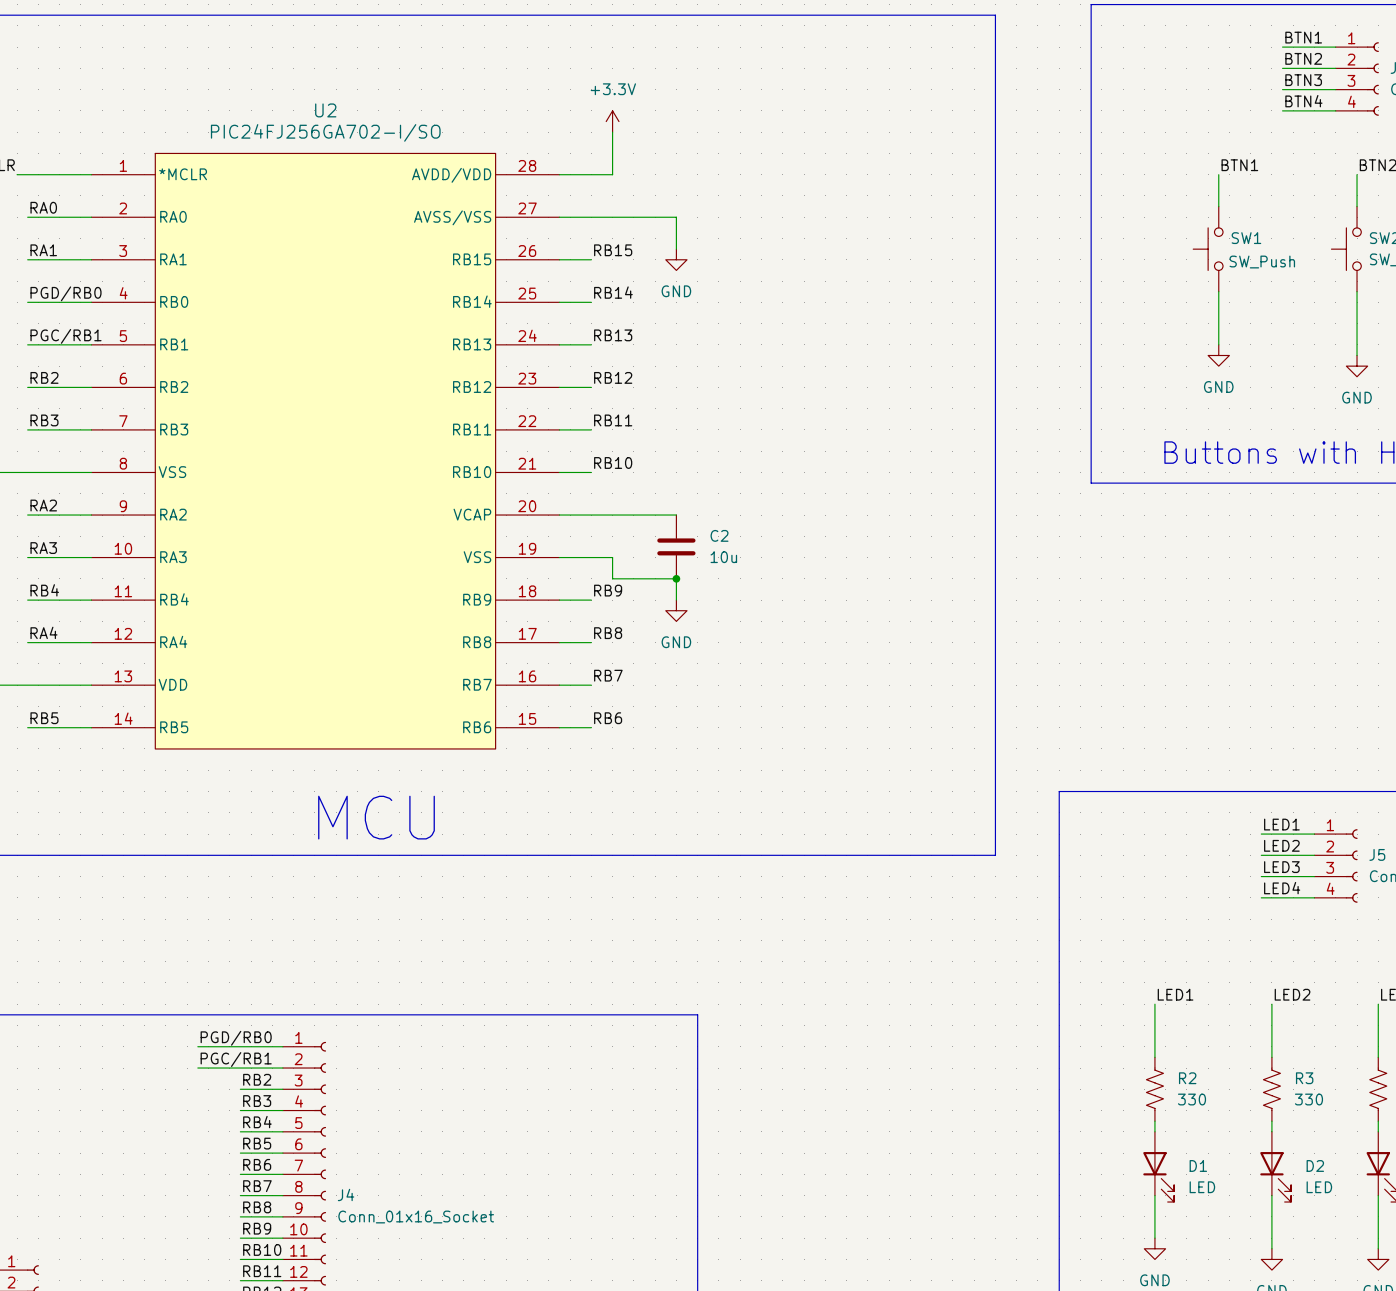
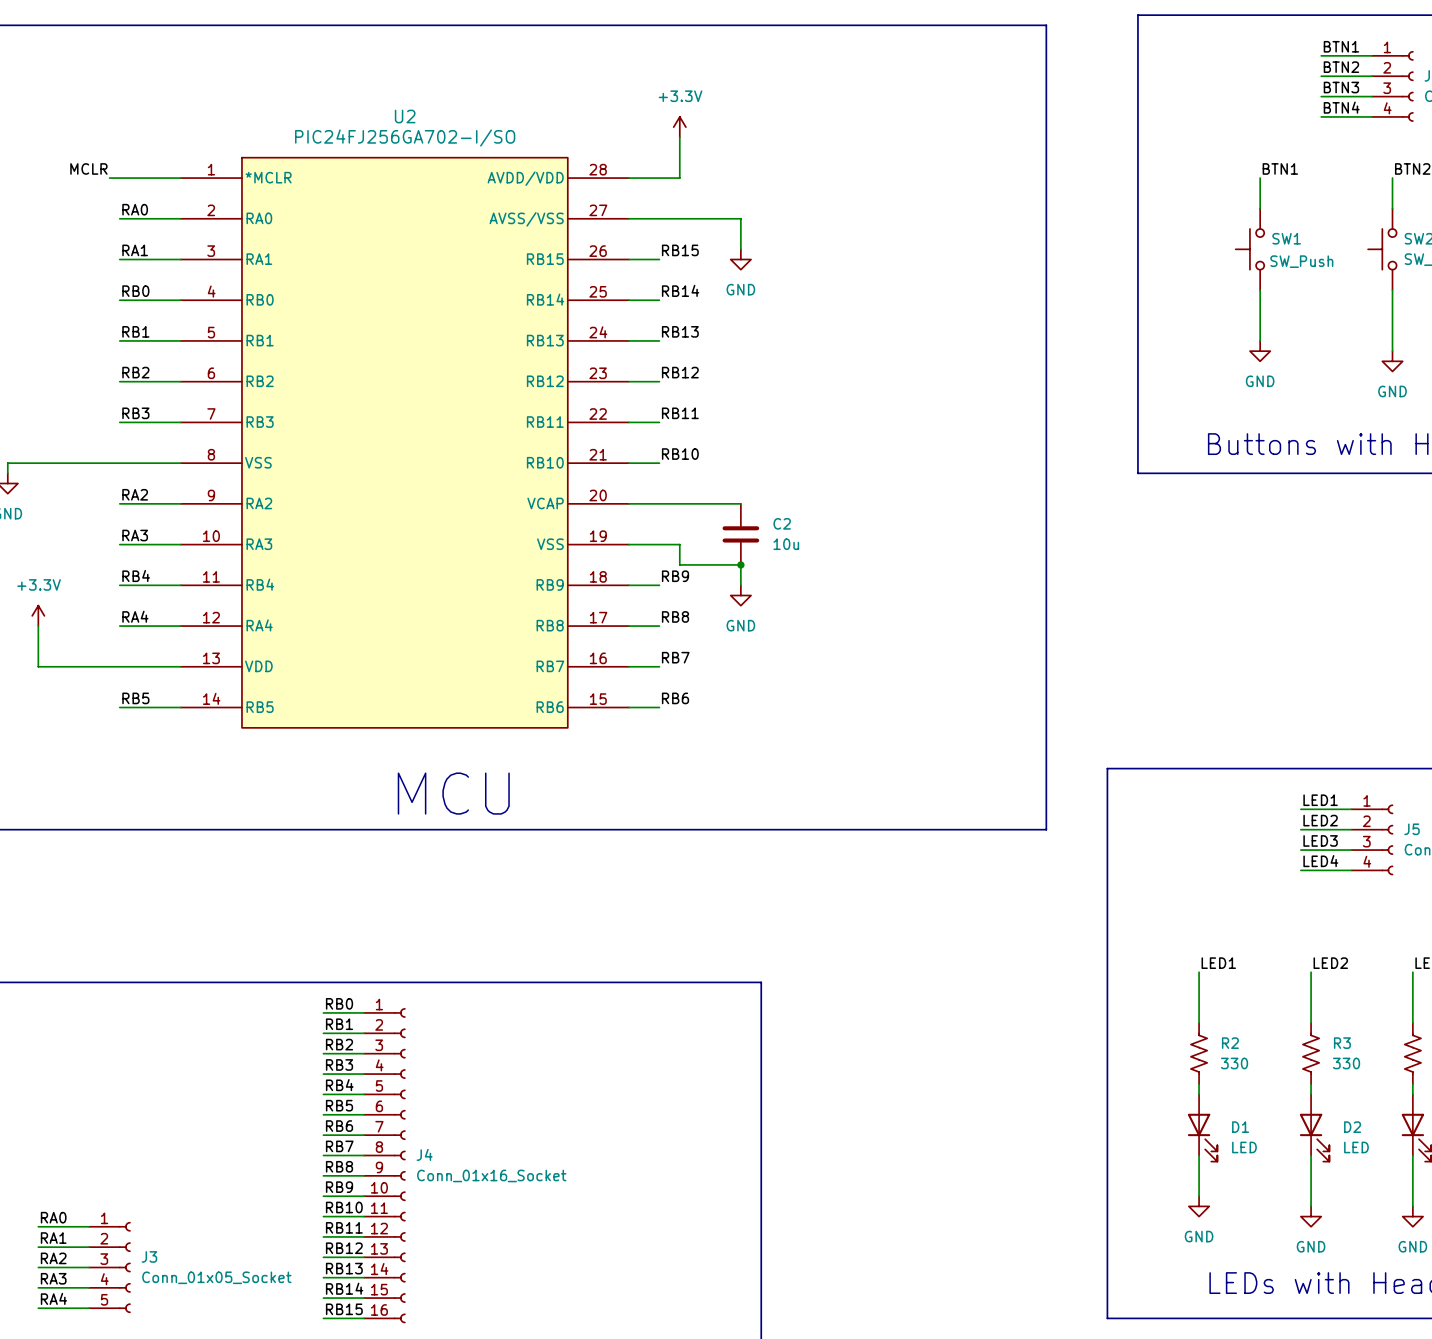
label: PGD/RB0 (66, 293) -> RB0 (135, 291)
label: PGC/RB1 (66, 336) -> RB1 (135, 331)
label: none -> RB0 (339, 1003)
label: PGD/RB0 (236, 1038) -> none
wire: (197, 1046) (240, 1046) -> none
label: none -> RB1 (339, 1024)
label: PGC/RB1 (236, 1059) -> none
wire: (197, 1068) (240, 1068) -> none

